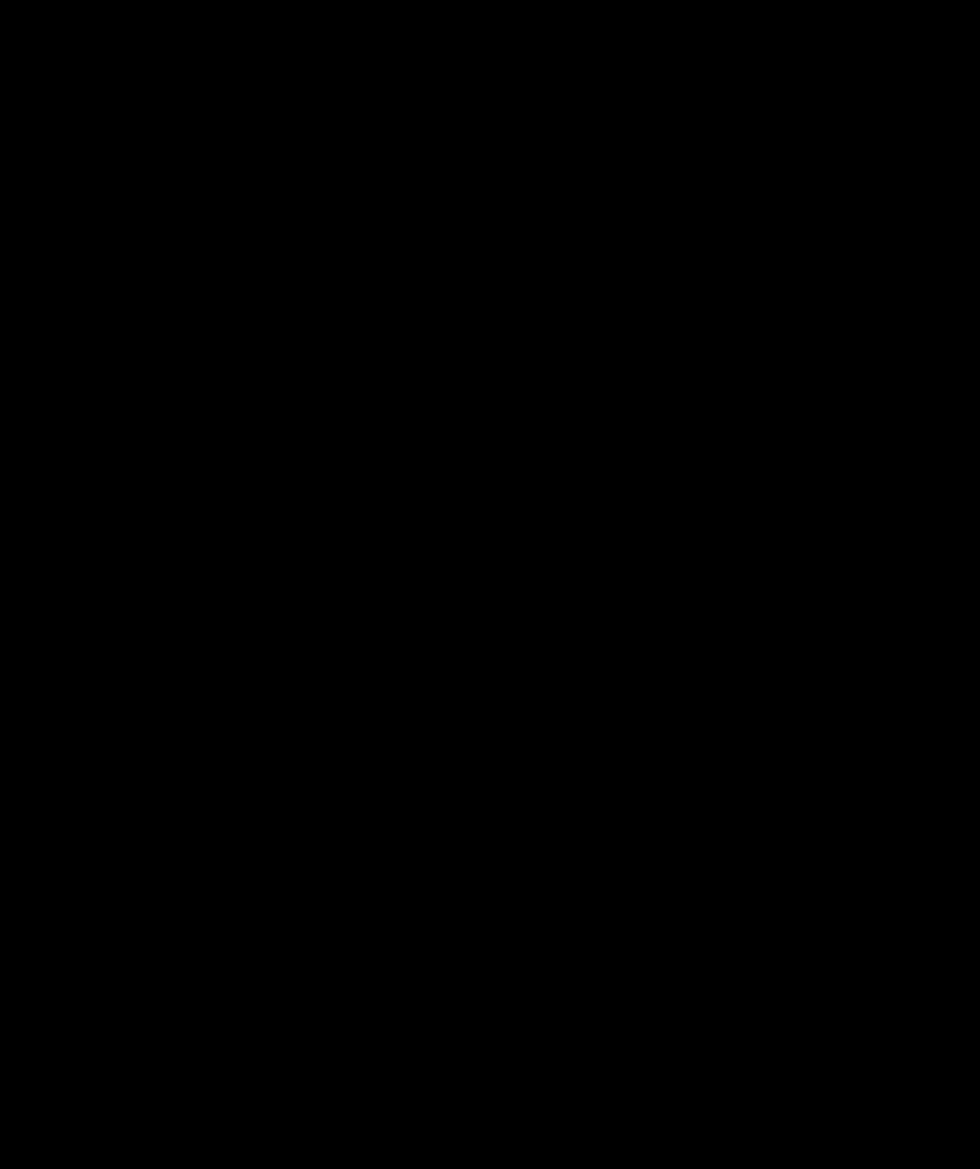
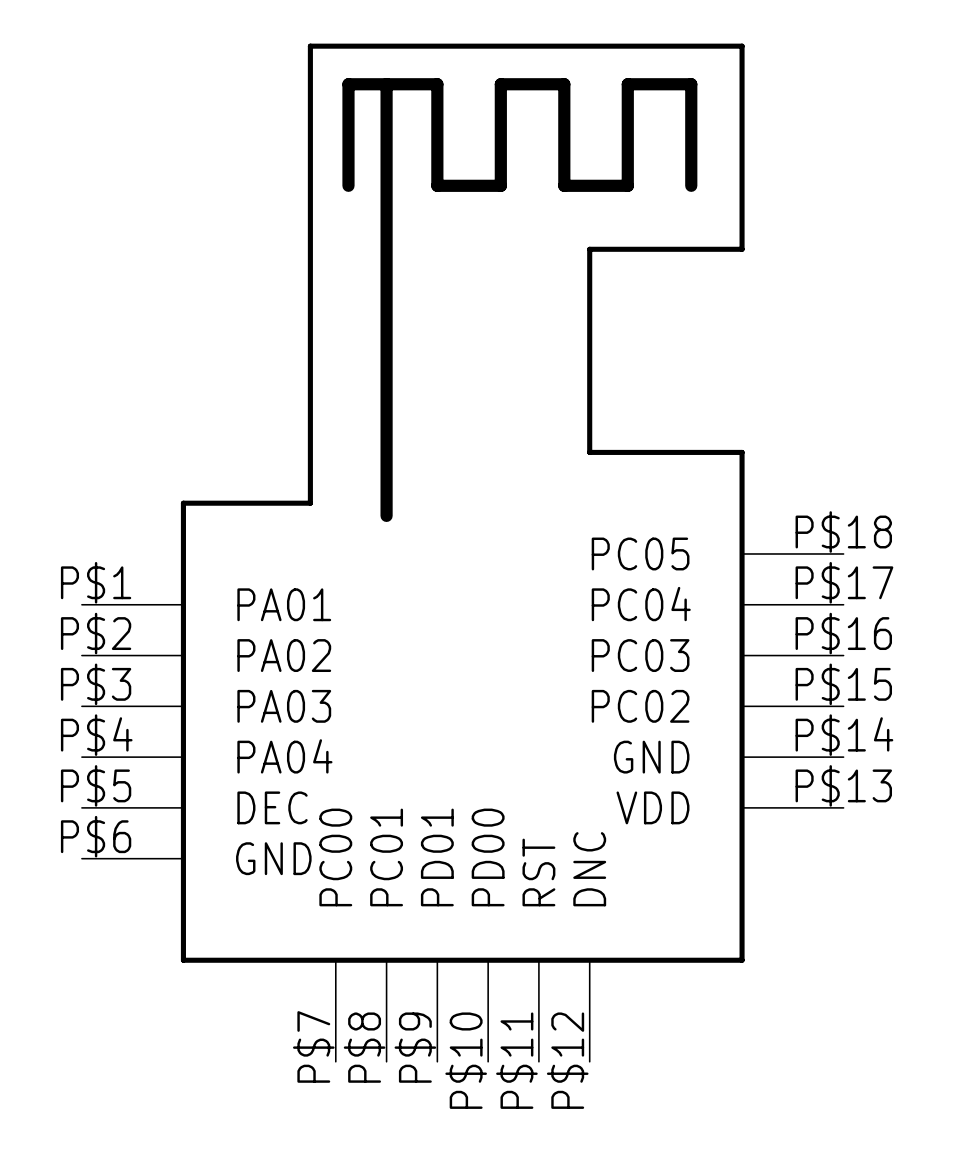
part: none -> (462, 552)

